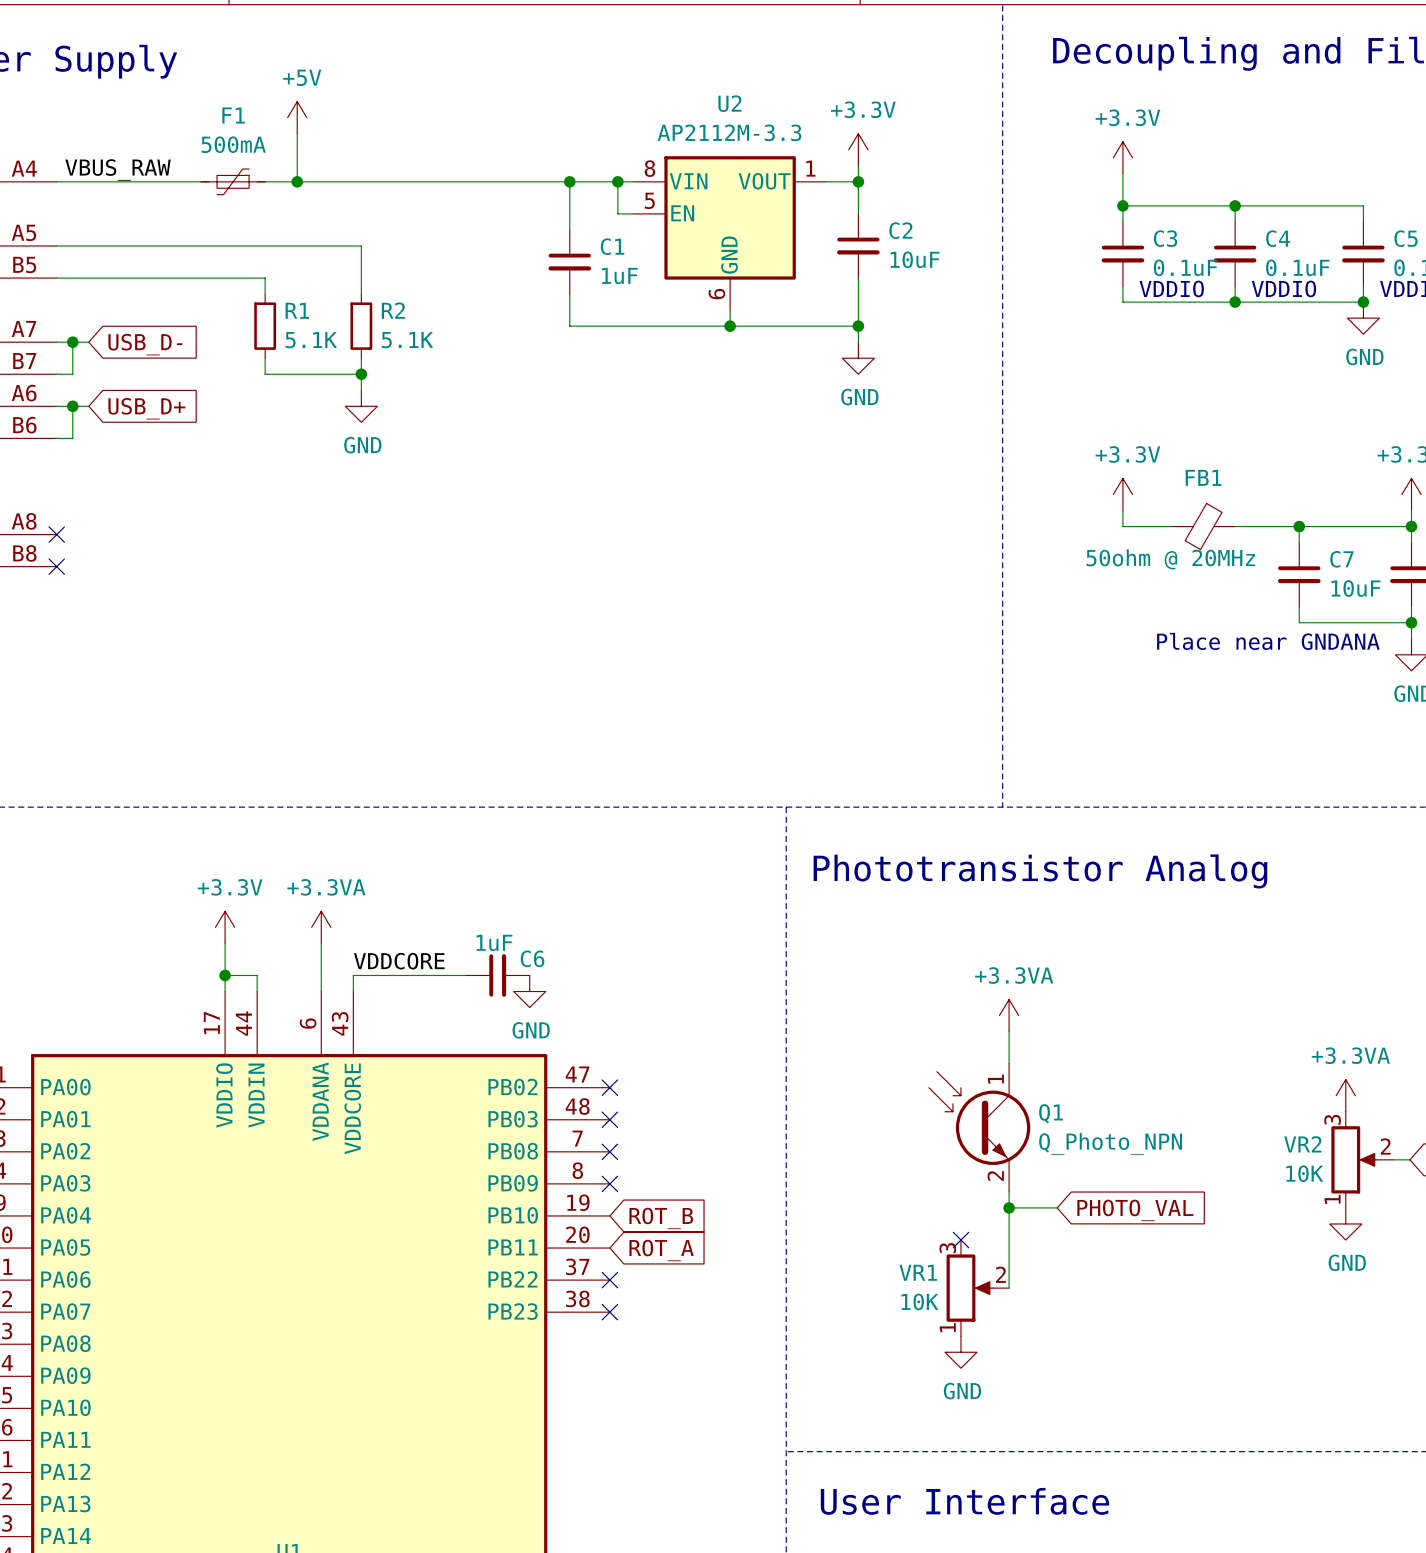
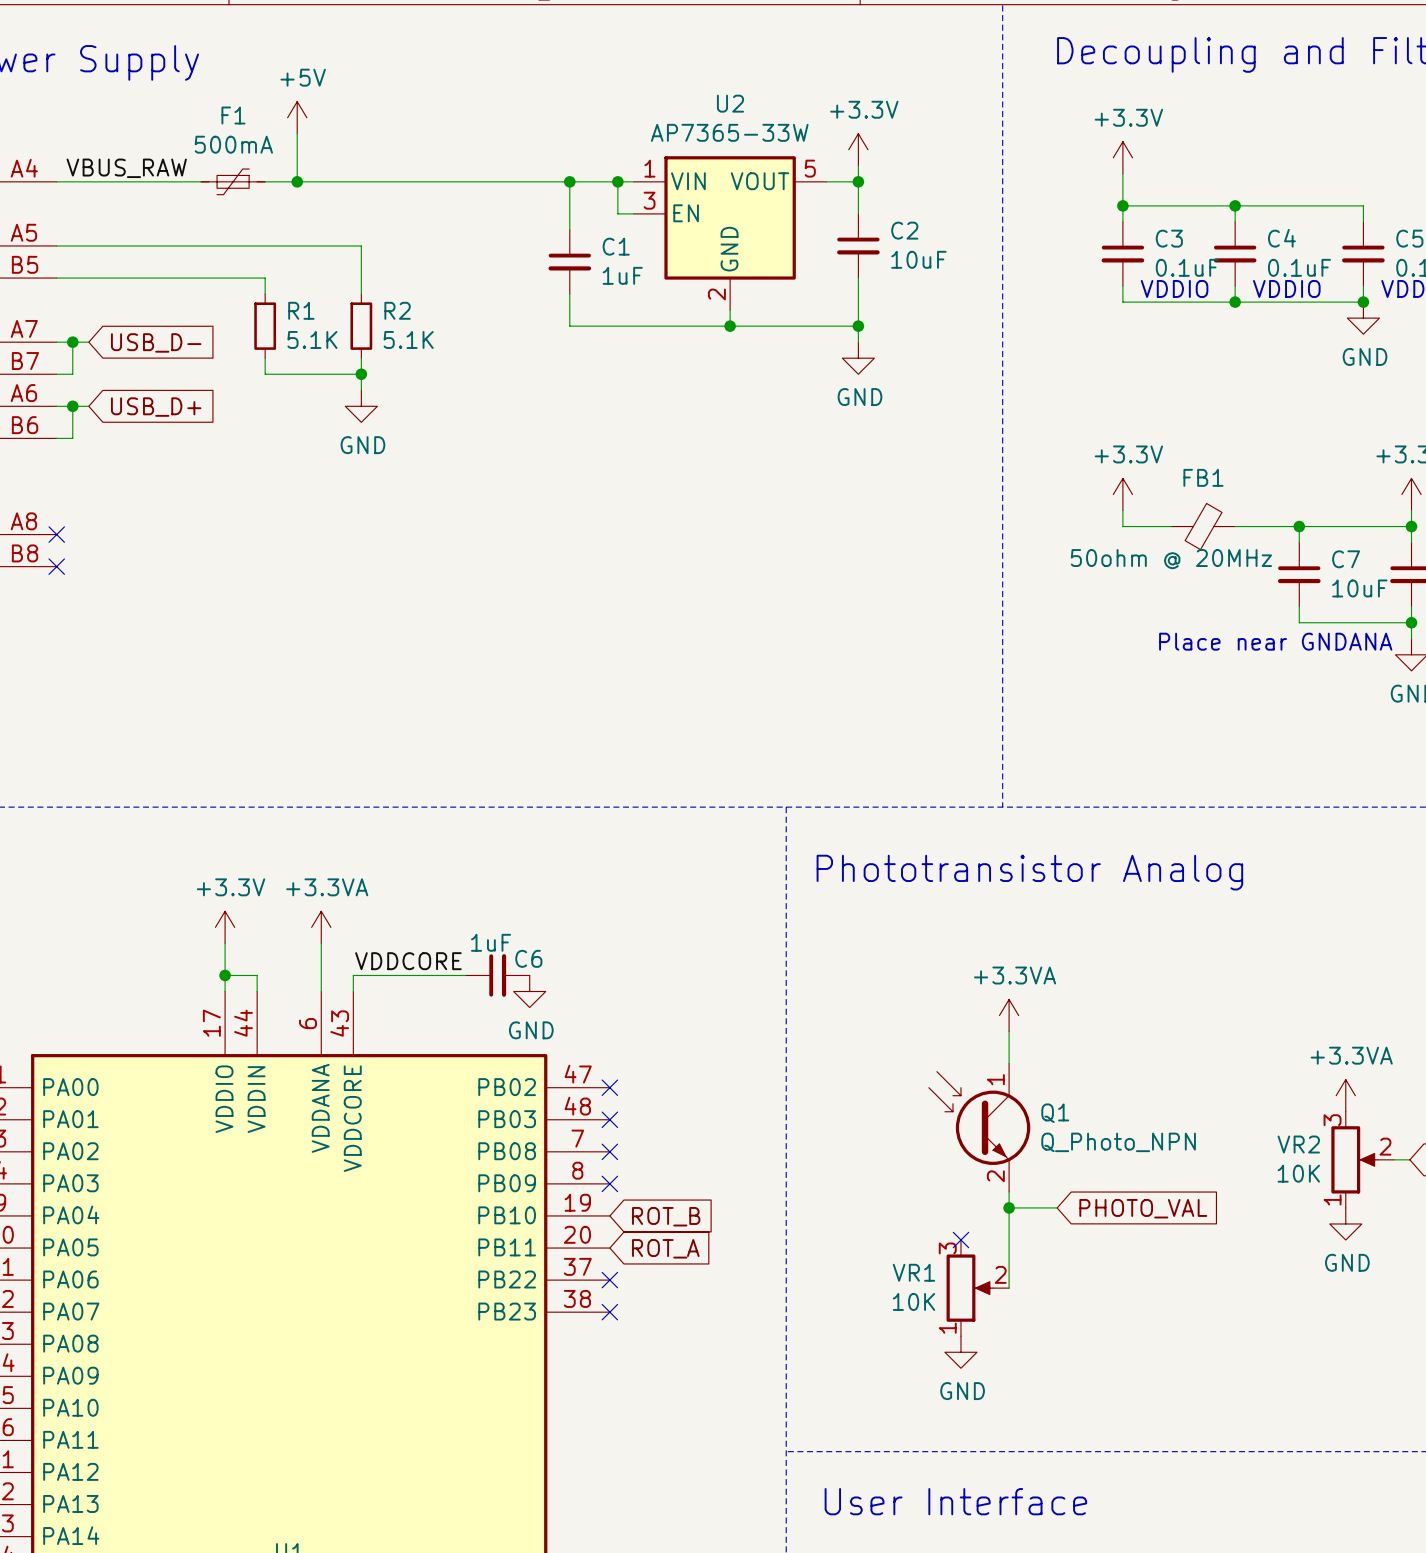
U2 value: AP2112M-3.3 (729, 132) -> AP7365-33W (729, 132)
U2 pin number: 8 (649, 168) -> 1 (649, 168)
U2 pin number: 1 (810, 168) -> 5 (810, 168)
U2 pin number: 5 (649, 200) -> 3 (649, 200)
U2 pin number: 6 (716, 294) -> 2 (716, 294)

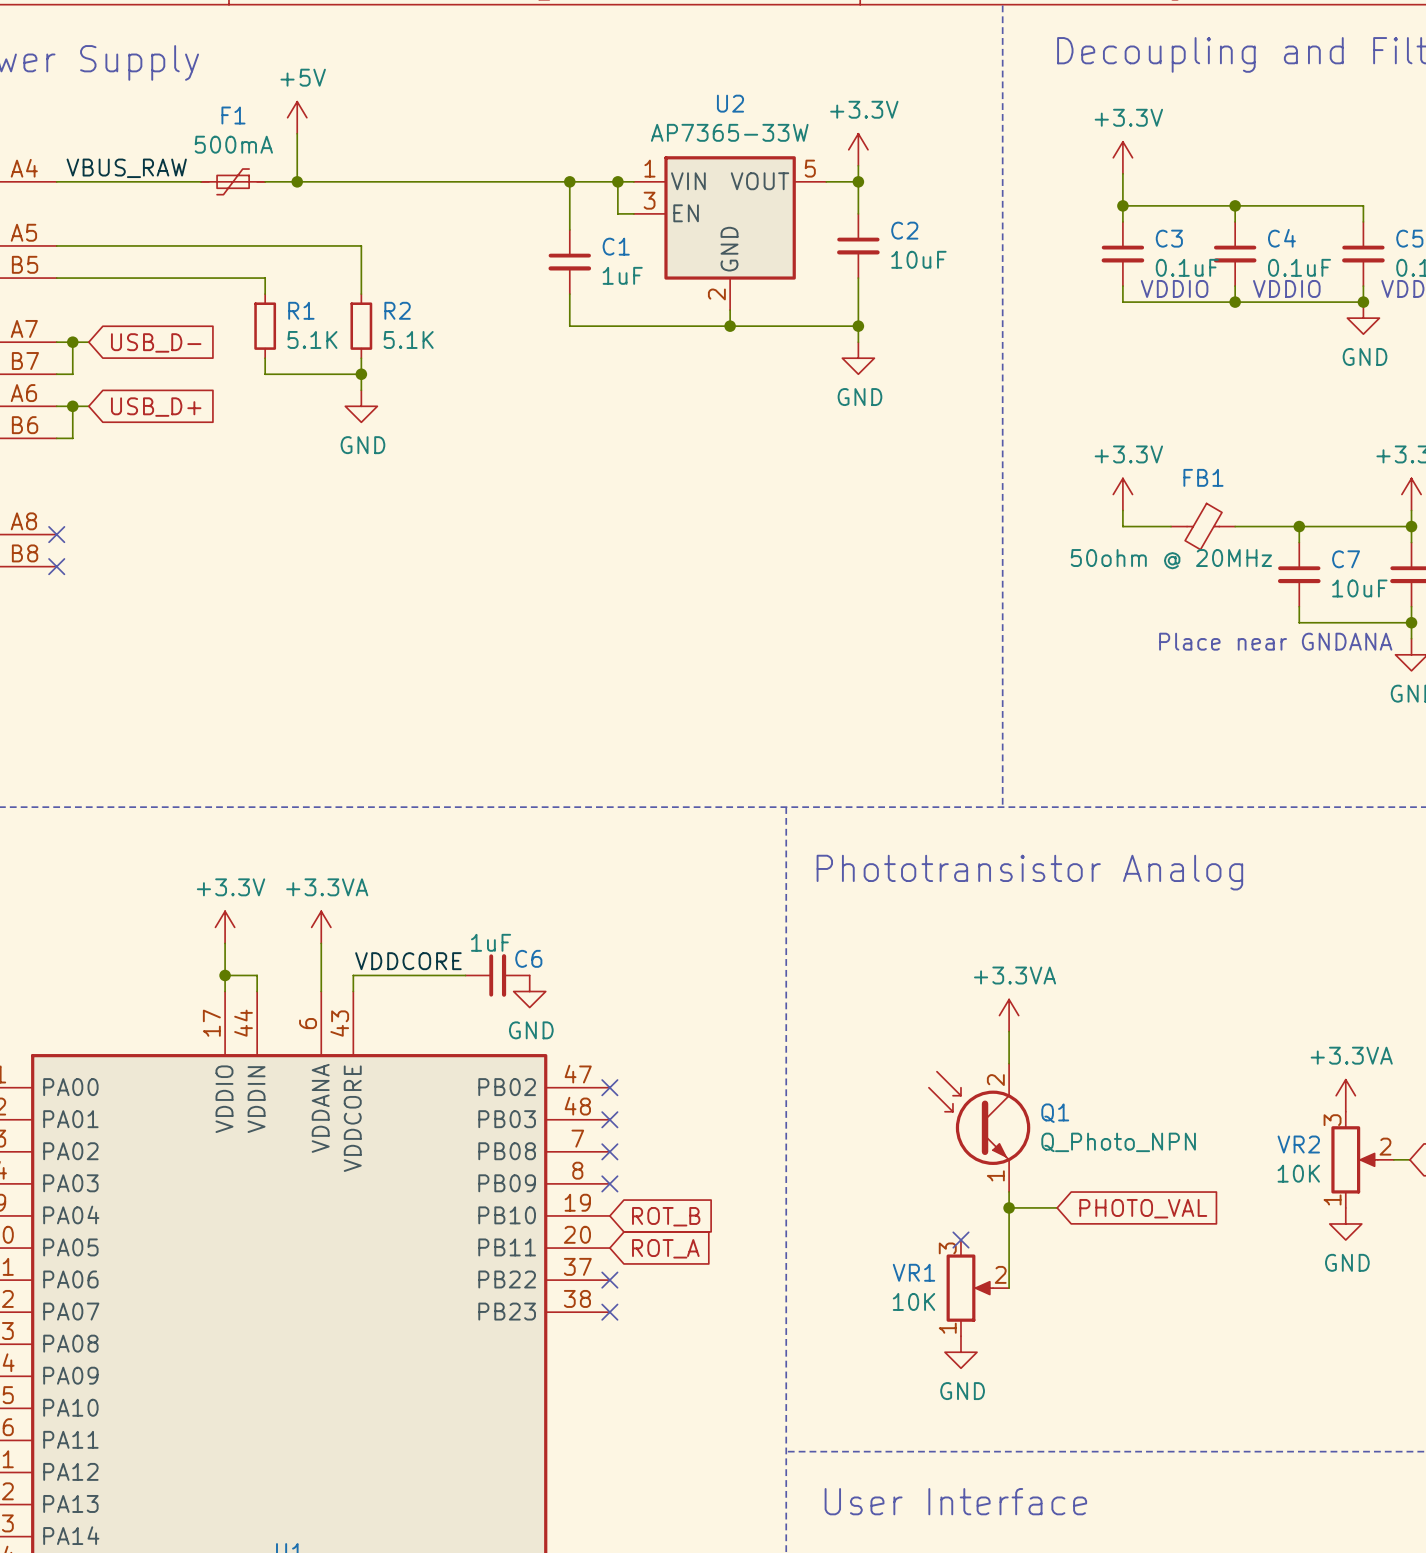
Q1 pin number: 1 (995, 1079) -> 2 (995, 1080)
Q1 pin number: 2 (995, 1176) -> 1 (995, 1175)

